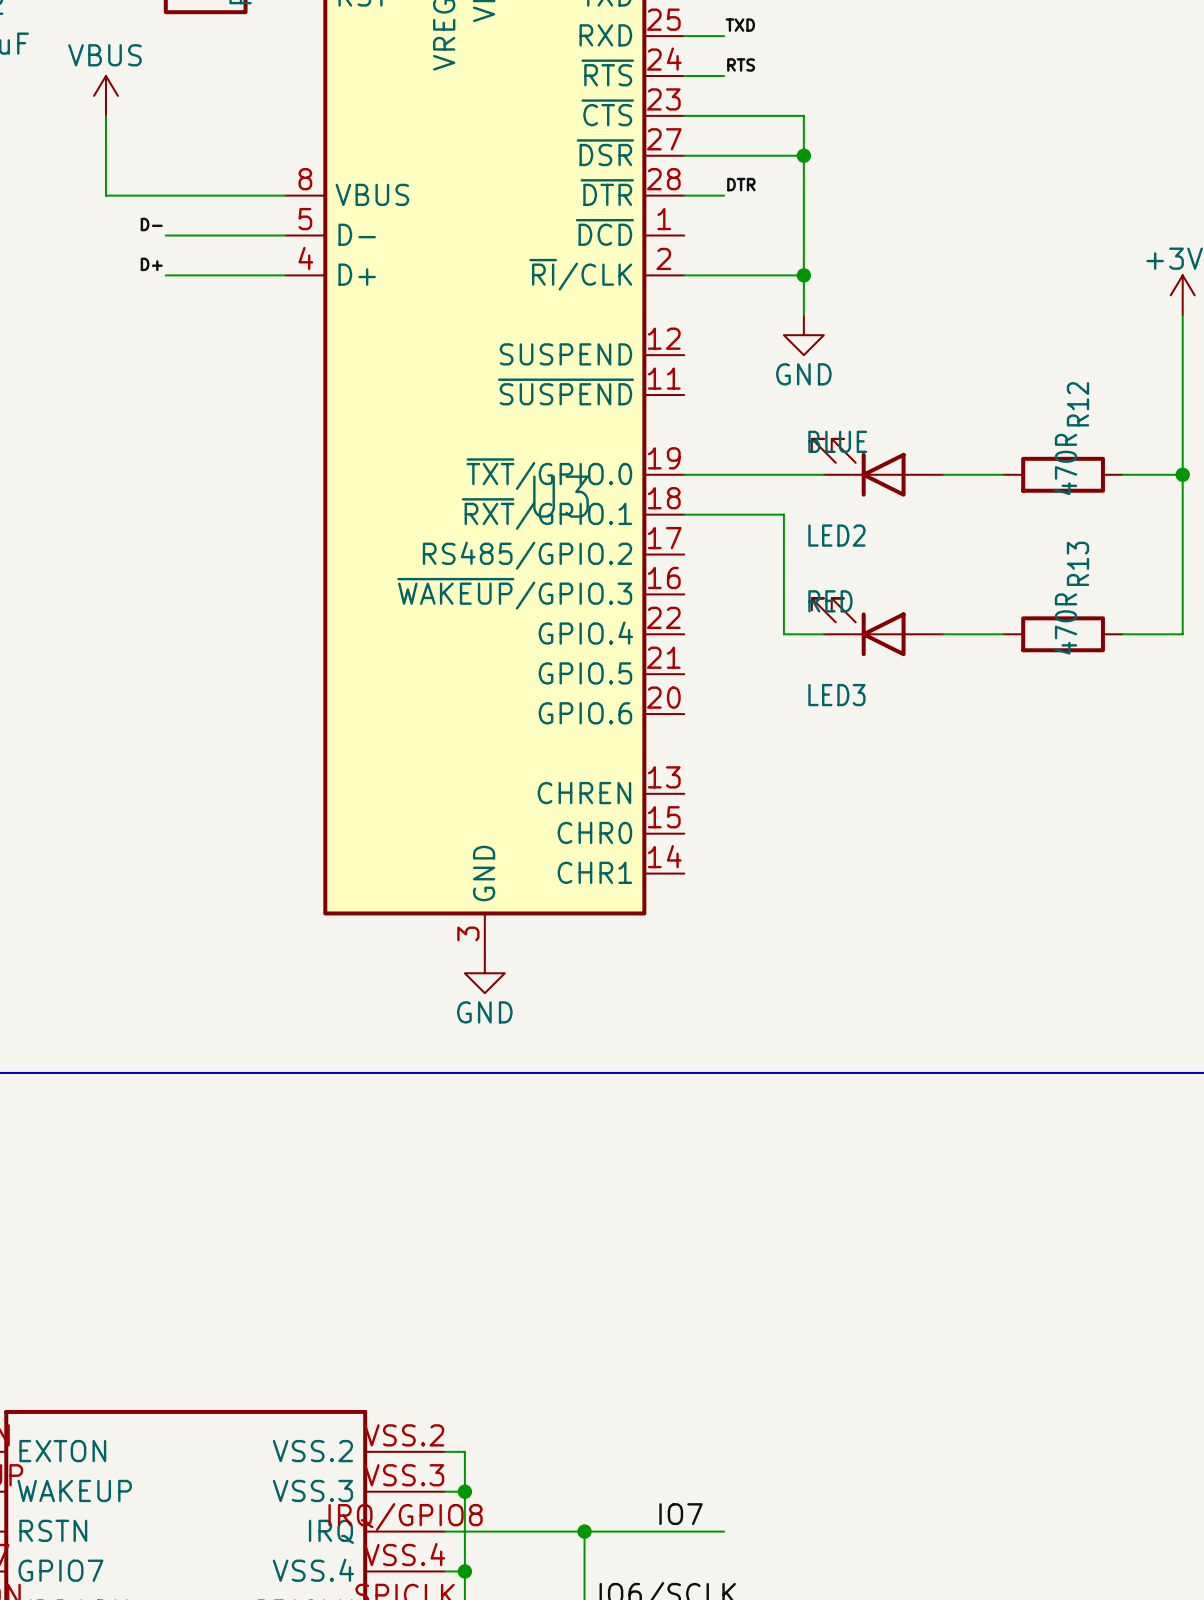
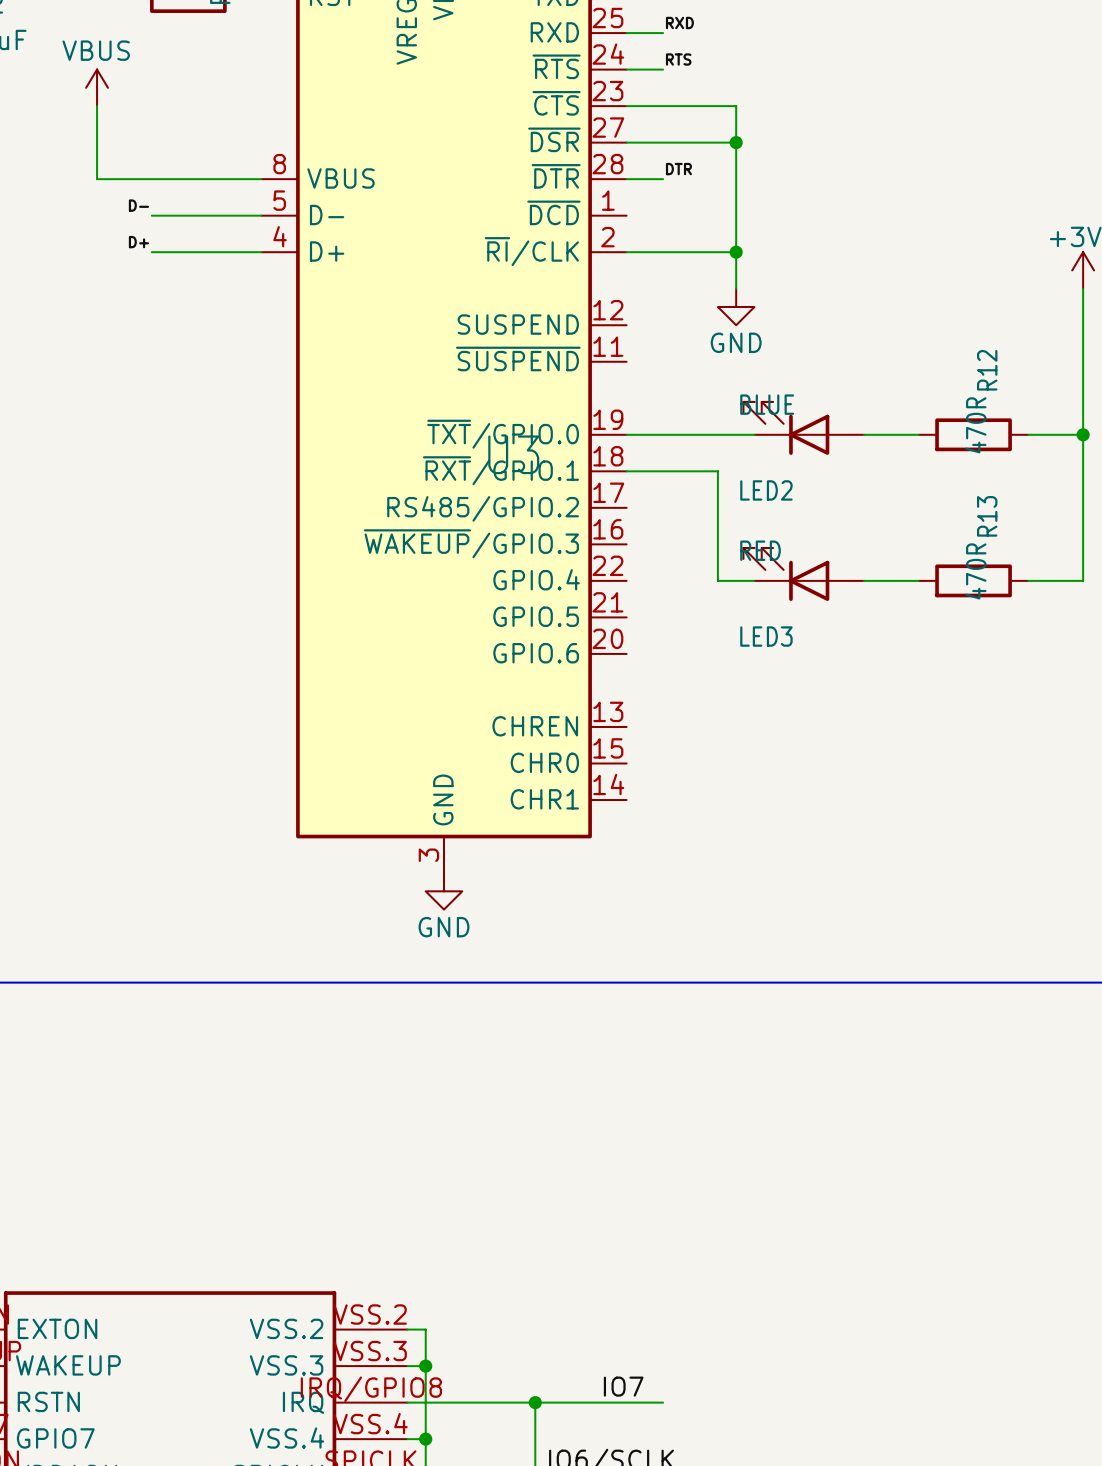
label: TXD (740, 25) -> RXD (679, 22)

